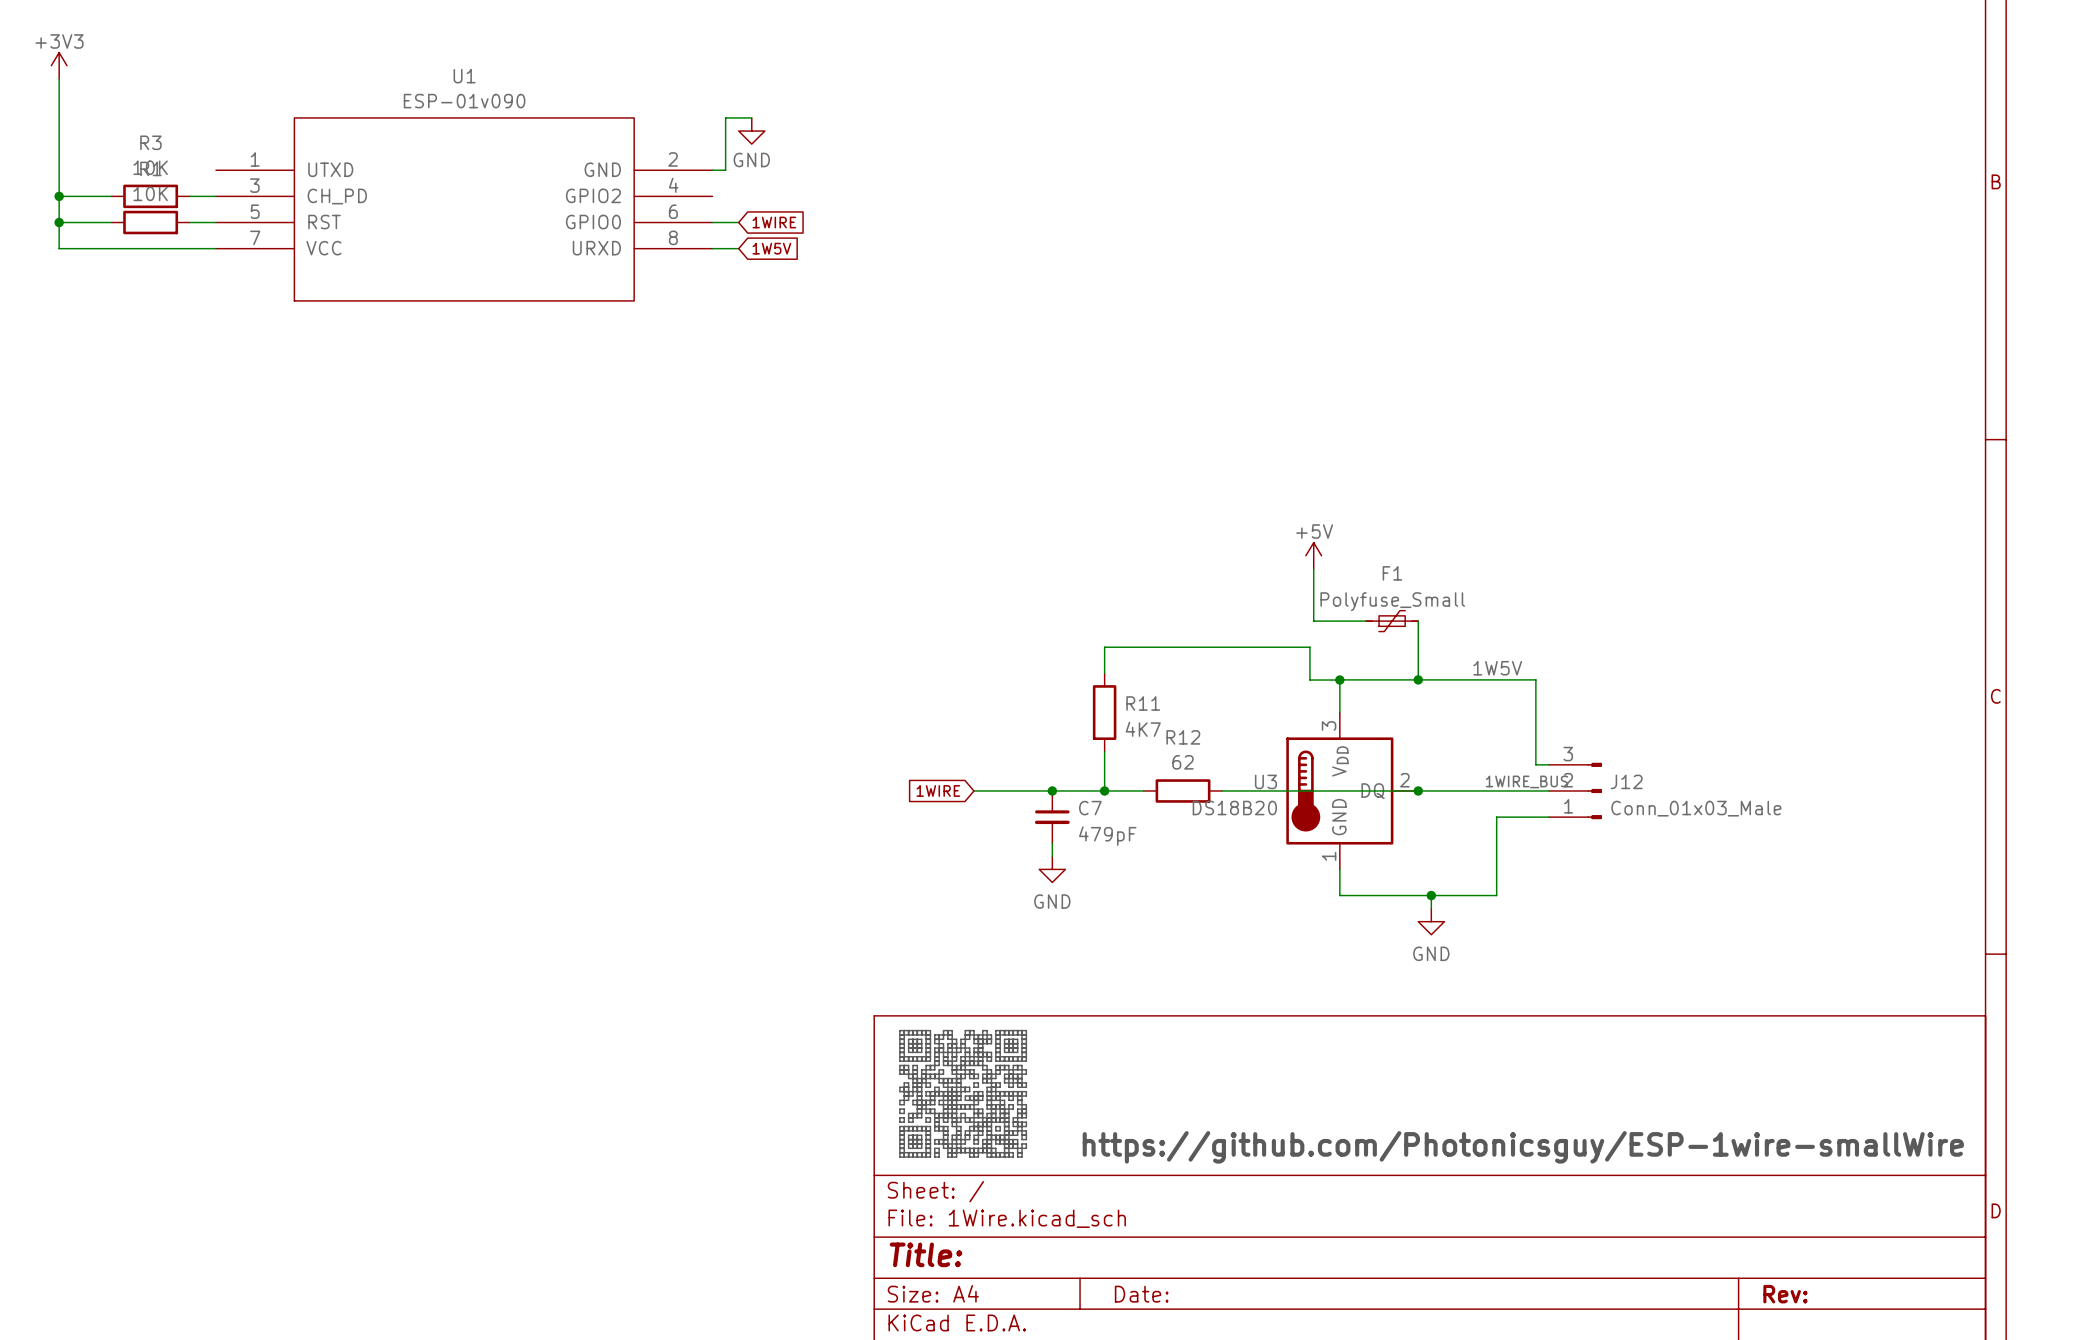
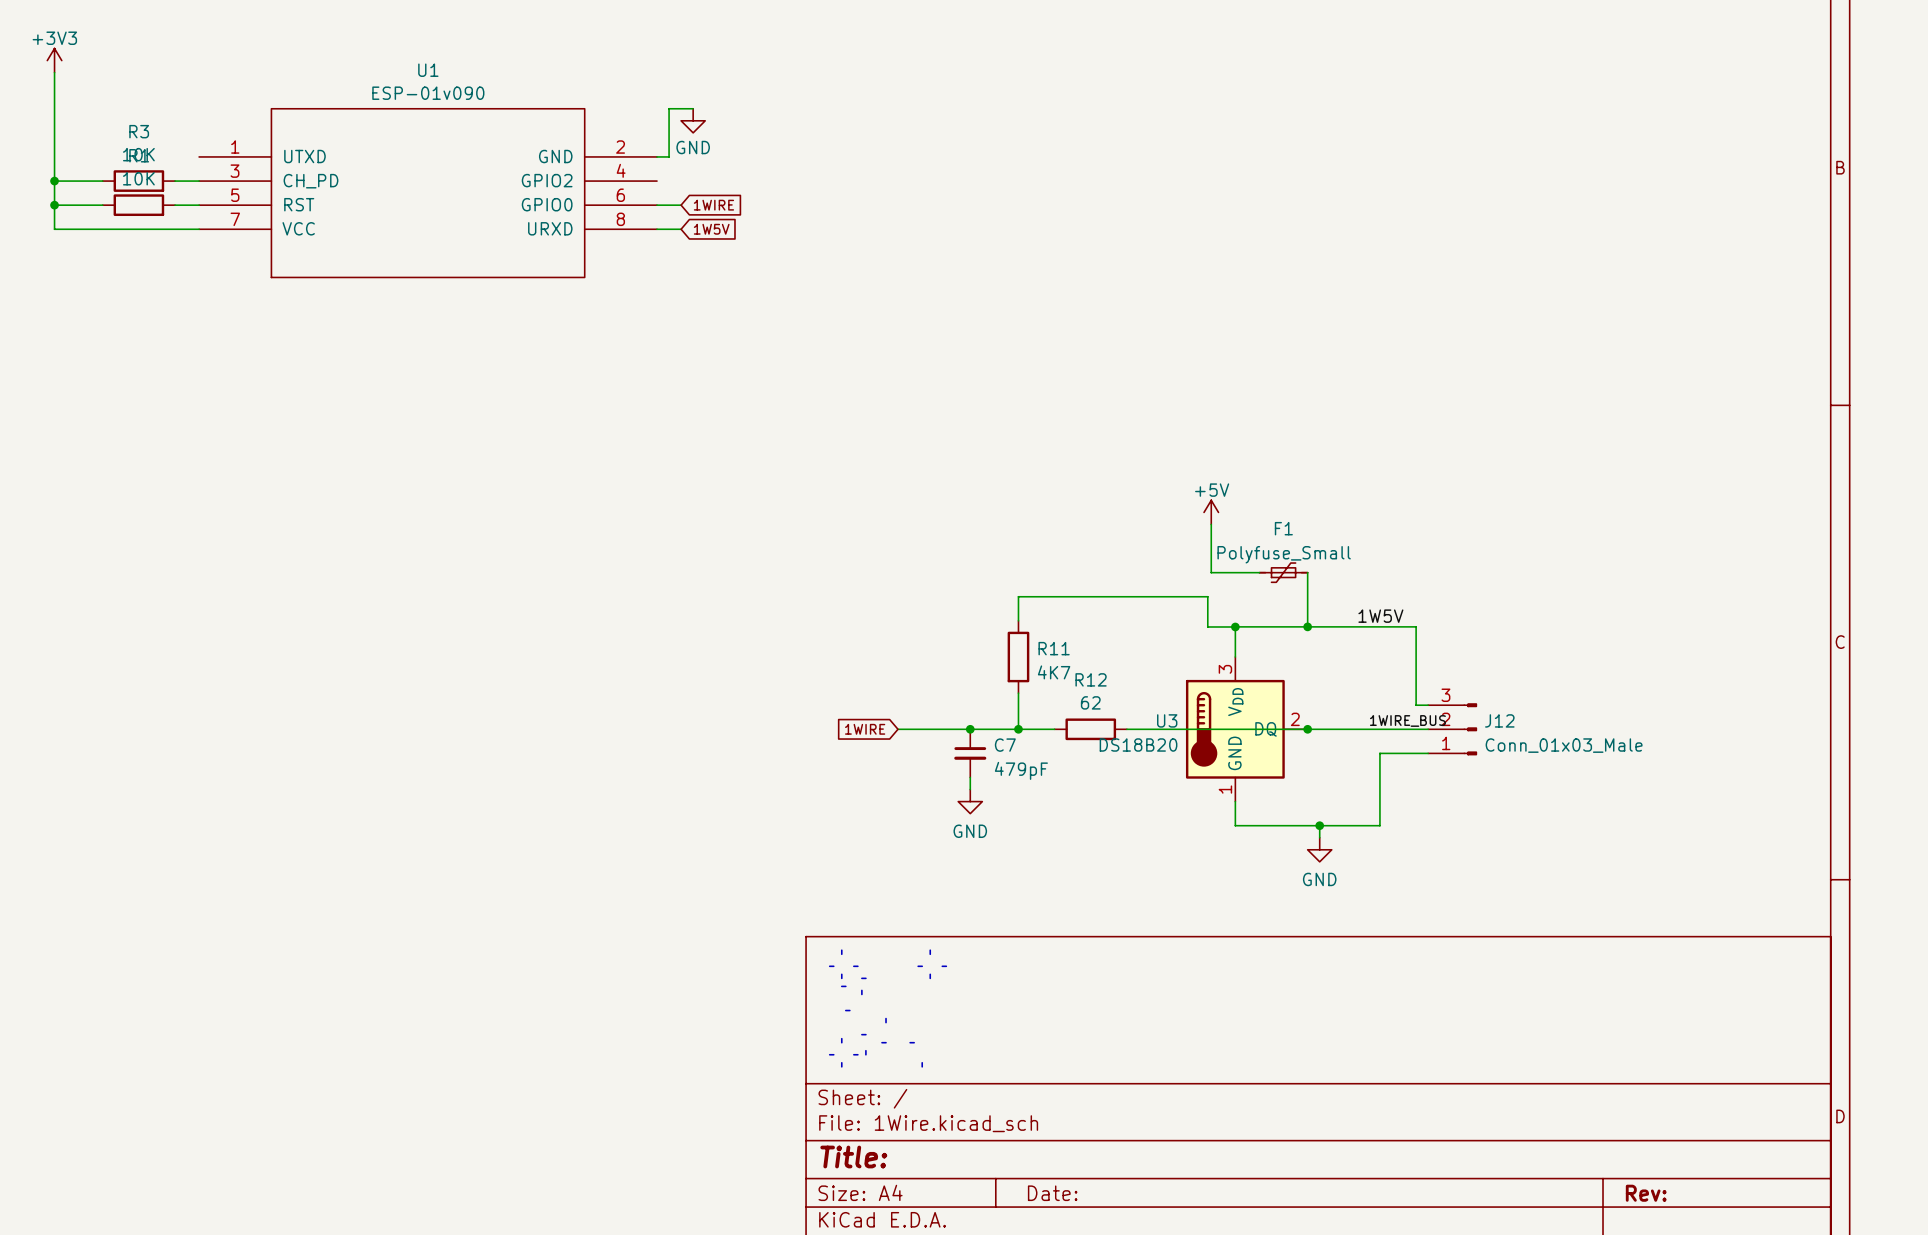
line: (899, 1030) (899, 1061) (930, 1061) (930, 1030) (899, 1030) -> none
line: (904, 1030) (904, 1061) -> none
line: (926, 1030) (926, 1061) -> none
line: (947, 1030) (947, 1039) (956, 1039) (956, 1061) (943, 1061) -> none
line: (969, 1030) (969, 1039) (960, 1039) (960, 1052) (934, 1052) -> none
line: (995, 1030) (1026, 1030) (1026, 1061) (995, 1061) (995, 1030) -> none
line: (1000, 1030) (1000, 1061) -> none
line: (1022, 1030) (1022, 1061) -> none
line: (899, 1034) (930, 1034) -> none
line: (939, 1034) (939, 1065) (926, 1065) (926, 1087) (930, 1087) (930, 1082) (912, 1082) -> none
line: (952, 1034) (934, 1034) (934, 1043) (943, 1043) (943, 1065) (987, 1065) (987, 1082) -> none
line: (965, 1034) (991, 1034) (991, 1043) (974, 1043) (974, 1030) (965, 1030) (965, 1078) (908, 1078) (908, 1065) (899, 1065) (899, 1074) (917, 1074) -> none
line: (978, 1034) (978, 1065) -> none
line: (995, 1034) (1026, 1034) -> none
line: (908, 1039) (908, 1052) (921, 1052) (921, 1039) (908, 1039) -> none
line: (912, 1039) (912, 1052) -> none
line: (917, 1039) (917, 1052) -> none
line: (934, 1039) (943, 1039) (943, 1030) (952, 1030) (952, 1074) (978, 1074) (978, 1078) (969, 1078) (969, 1069) -> none
line: (974, 1039) (991, 1039) -> none
line: (1004, 1039) (1004, 1052) (1017, 1052) (1017, 1039) (1004, 1039) -> none
line: (1008, 1039) (1008, 1052) -> none
line: (1013, 1039) (1013, 1052) -> none
line: (908, 1043) (921, 1043) -> none
line: (956, 1043) (947, 1043) (947, 1065) -> none
line: (987, 1043) (987, 1030) (982, 1030) (982, 1069) (991, 1069) (991, 1157) -> none
line: (1004, 1043) (1017, 1043) -> none
line: (908, 1048) (921, 1048) -> none
line: (943, 1048) (934, 1048) (934, 1069) (921, 1069) (921, 1117) (908, 1117) -> none
line: (947, 1048) (969, 1048) (969, 1065) -> none
line: (982, 1048) (974, 1048) (974, 1065) -> none
line: (1004, 1048) (1017, 1048) -> none
line: (974, 1052) (991, 1052) (991, 1061) (987, 1061) (987, 1052) -> none
line: (899, 1056) (930, 1056) -> none
line: (991, 1056) (960, 1056) (960, 1069) -> none
line: (995, 1056) (1026, 1056) -> none
line: (960, 1061) (982, 1061) -> none
line: (904, 1065) (904, 1074) -> none
line: (956, 1065) (956, 1157) (947, 1157) (947, 1126) (934, 1126) -> none
line: (1000, 1065) (1000, 1074) (982, 1074) (982, 1082) (1000, 1082) (1000, 1087) (987, 1087) (987, 1109) (1013, 1109) (1013, 1104) (1008, 1104) (1008, 1157) -> none
line: (899, 1069) (908, 1069) -> none
line: (952, 1069) (974, 1069) (974, 1078) -> none
line: (995, 1069) (1026, 1069) (1026, 1074) (1004, 1074) (1004, 1082) (1026, 1082) (1026, 1087) (1017, 1087) (1017, 1074) -> none
line: (921, 1074) (943, 1074) (943, 1069) (939, 1069) (939, 1082) (960, 1082) -> none
line: (960, 1074) (960, 1100) (939, 1100) (939, 1104) (978, 1104) (978, 1091) -> none
line: (943, 1078) (943, 1087) (969, 1087) (969, 1091) (926, 1091) (926, 1096) (960, 1096) -> none
line: (947, 1078) (947, 1122) (943, 1122) (943, 1091) -> none
line: (982, 1078) (995, 1078) (995, 1065) (1008, 1065) (1008, 1087) (1013, 1087) (1013, 1065) (1022, 1065) (1022, 1087) -> none
line: (1004, 1078) (1022, 1078) -> none
line: (904, 1082) (908, 1082) (908, 1100) (899, 1100) (899, 1104) (904, 1104) (904, 1082) -> none
line: (974, 1082) (978, 1082) (978, 1087) (974, 1087) (974, 1082) -> none
line: (995, 1082) (995, 1100) -> none
line: (908, 1087) (899, 1087) (899, 1091) (921, 1091) -> none
line: (912, 1087) (921, 1087) -> none
line: (952, 1087) (952, 1126) (960, 1126) (960, 1152) -> none
line: (930, 1091) (930, 1104) -> none
line: (987, 1091) (1026, 1091) (1026, 1096) (987, 1096) -> none
line: (1000, 1091) (1000, 1122) -> none
line: (1008, 1091) (1008, 1100) (1013, 1100) (1013, 1091) -> none
line: (1017, 1091) (1017, 1104) (1026, 1104) (1026, 1117) (1013, 1117) (1013, 1126) (1026, 1126) (1026, 1122) (1013, 1122) -> none
line: (1022, 1091) (1022, 1117) -> none
line: (904, 1096) (912, 1096) (912, 1065) (917, 1065) (917, 1117) -> none
line: (939, 1096) (939, 1087) (934, 1087) (934, 1104) (912, 1104) (912, 1100) (934, 1100) -> none
line: (982, 1096) (965, 1096) (965, 1100) (982, 1100) (982, 1091) (974, 1091) (974, 1130) -> none
line: (926, 1100) (926, 1113) (956, 1113) -> none
line: (987, 1100) (1004, 1100) (1004, 1157) -> none
line: (987, 1104) (1004, 1104) -> none
line: (995, 1104) (995, 1122) -> none
line: (899, 1109) (899, 1113) (904, 1113) (904, 1109) (899, 1109) -> none
line: (917, 1109) (934, 1109) (934, 1130) (947, 1130) -> none
line: (943, 1109) (982, 1109) (982, 1135) (974, 1135) (974, 1143) (978, 1143) (978, 1122) -> none
line: (978, 1109) (978, 1117) -> none
line: (1026, 1109) (1017, 1109) (1017, 1135) (987, 1135) -> none
line: (912, 1113) (912, 1122) (908, 1122) (908, 1113) (921, 1113) -> none
line: (939, 1113) (939, 1130) -> none
line: (974, 1113) (982, 1113) -> none
line: (995, 1113) (987, 1113) (987, 1157) (1013, 1157) (1013, 1152) (947, 1152) -> none
line: (1000, 1113) (1008, 1113) -> none
line: (1017, 1113) (1026, 1113) -> none
line: (899, 1117) (899, 1122) (904, 1122) (904, 1117) (899, 1117) -> none
line: (926, 1117) (926, 1122) (930, 1122) (930, 1117) (926, 1117) -> none
line: (934, 1117) (1008, 1117) -> none
line: (952, 1122) (960, 1122) (960, 1113) (965, 1113) (965, 1122) (1008, 1122) -> none
line: (1022, 1122) (1022, 1139) (1026, 1139) (1026, 1130) (1004, 1130) -> none
line: (899, 1126) (899, 1157) (930, 1157) (930, 1126) (899, 1126) -> none
line: (904, 1126) (904, 1157) -> none
line: (926, 1126) (926, 1157) -> none
line: (943, 1126) (943, 1148) (995, 1148) (995, 1157) -> none
line: (991, 1126) (969, 1126) (969, 1139) (952, 1139) -> none
line: (995, 1126) (995, 1130) (1000, 1130) (1000, 1126) (995, 1126) -> none
line: (899, 1130) (930, 1130) -> none
line: (982, 1130) (965, 1130) (965, 1143) (934, 1143) (934, 1139) (947, 1139) -> none
line: (908, 1135) (908, 1148) (921, 1148) (921, 1135) (908, 1135) -> none
line: (912, 1135) (912, 1148) -> none
line: (917, 1135) (917, 1148) -> none
line: (960, 1135) (952, 1135) (952, 1157) -> none
line: (995, 1135) (995, 1143) (1017, 1143) -> none
line: (1000, 1135) (1000, 1143) -> none
line: (908, 1139) (921, 1139) -> none
line: (1013, 1139) (1013, 1148) -> none
line: (908, 1143) (921, 1143) -> none
line: (982, 1143) (991, 1143) -> none
text: https://github.com/Photonicsguy/ESP-1wire-smallWire (1523, 1147) -> none
line: (934, 1148) (939, 1148) (939, 1157) (934, 1157) (934, 1148) -> none
line: (969, 1148) (969, 1157) (978, 1157) (978, 1148) -> none
line: (974, 1148) (974, 1157) -> none
line: (1004, 1148) (1026, 1148) (1026, 1143) (1022, 1143) (1022, 1157) (1017, 1157) (1017, 1139) (982, 1139) (982, 1152) -> none
line: (899, 1152) (930, 1152) -> none

